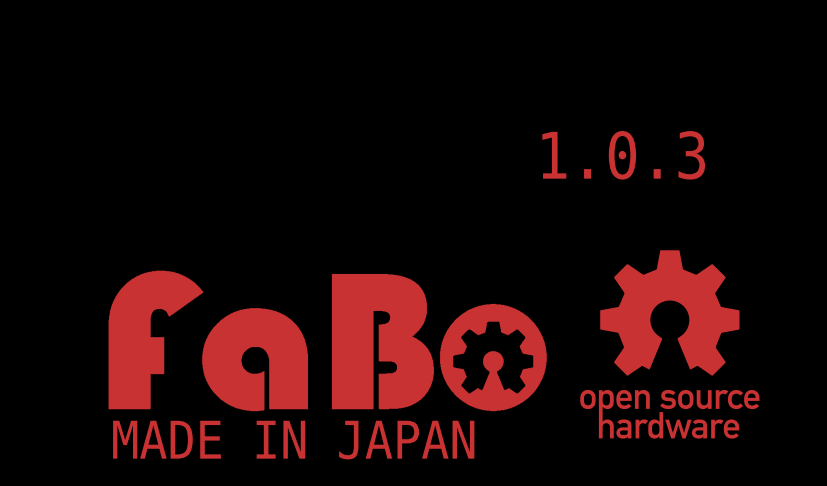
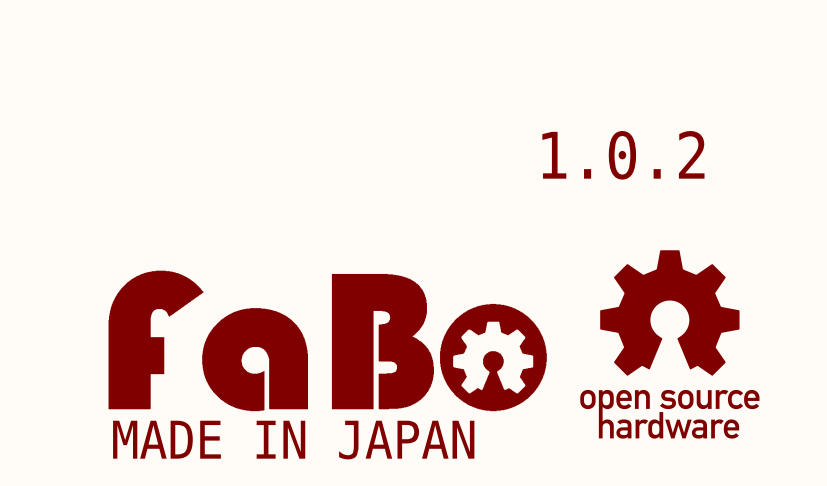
text: 1.0.3 (623, 155) -> 1.0.2 (623, 155)

